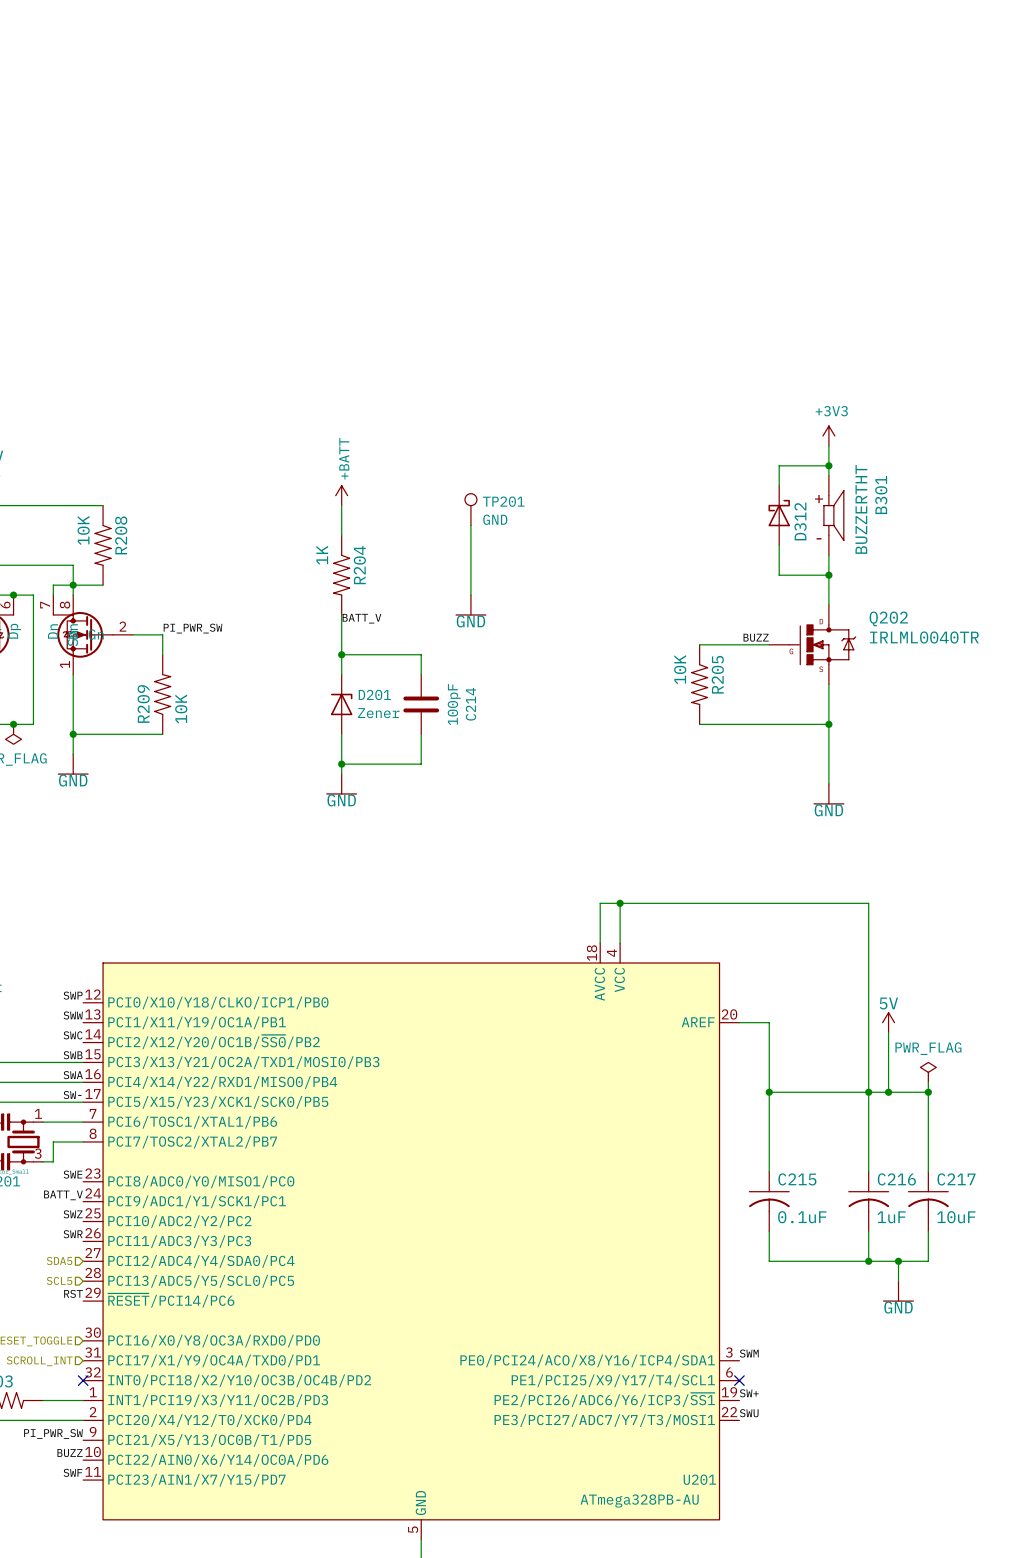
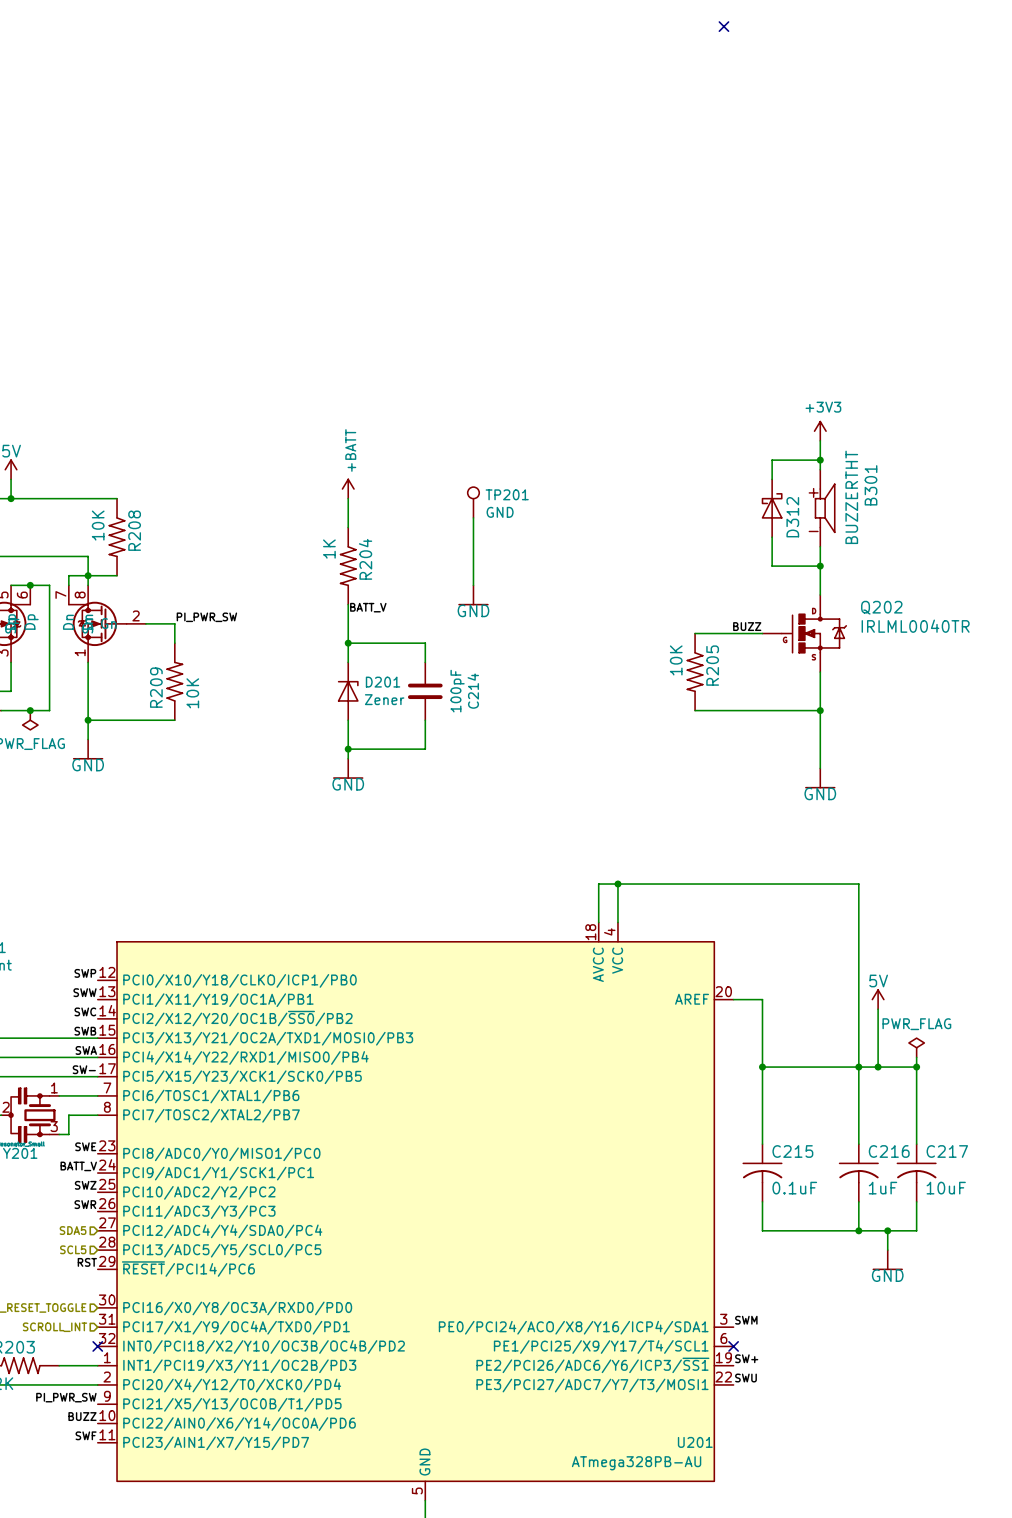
no-connect mark: none -> (723, 26)

